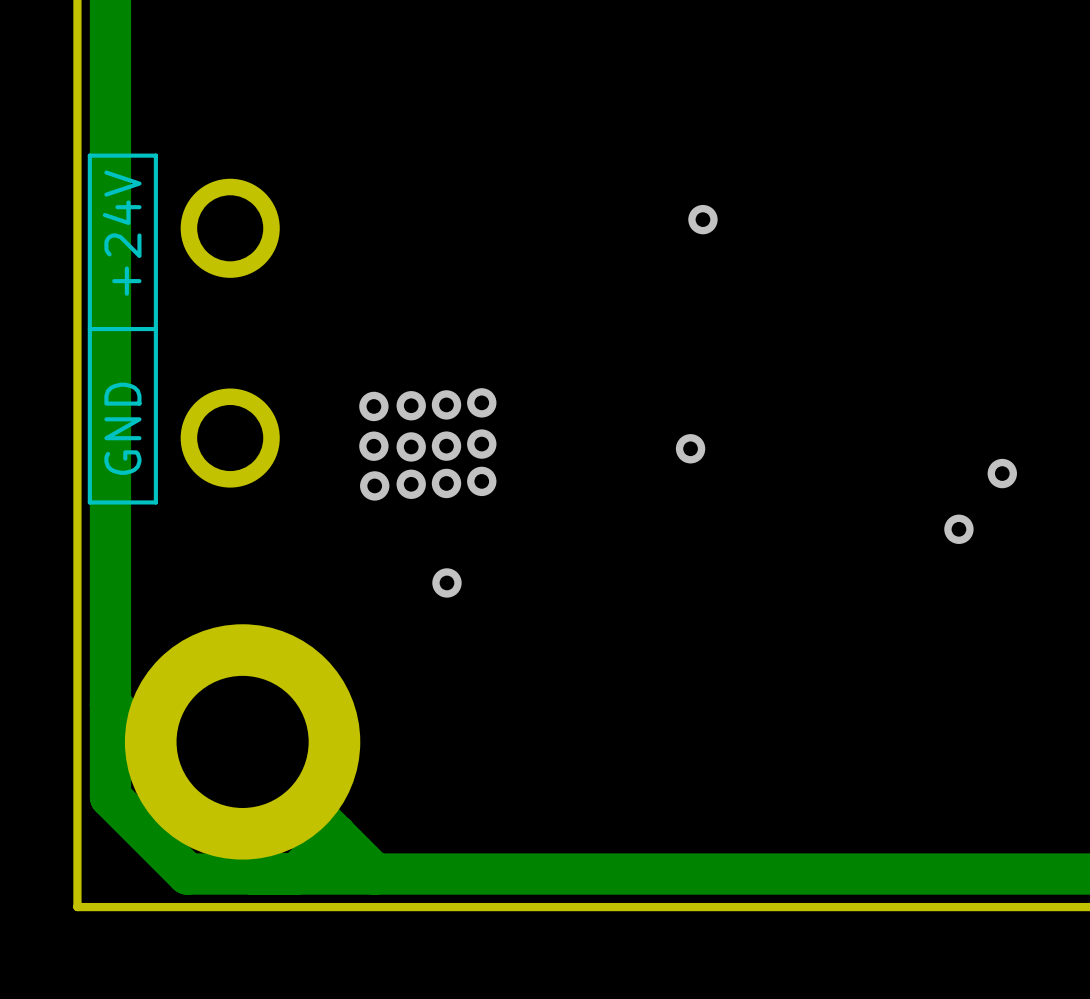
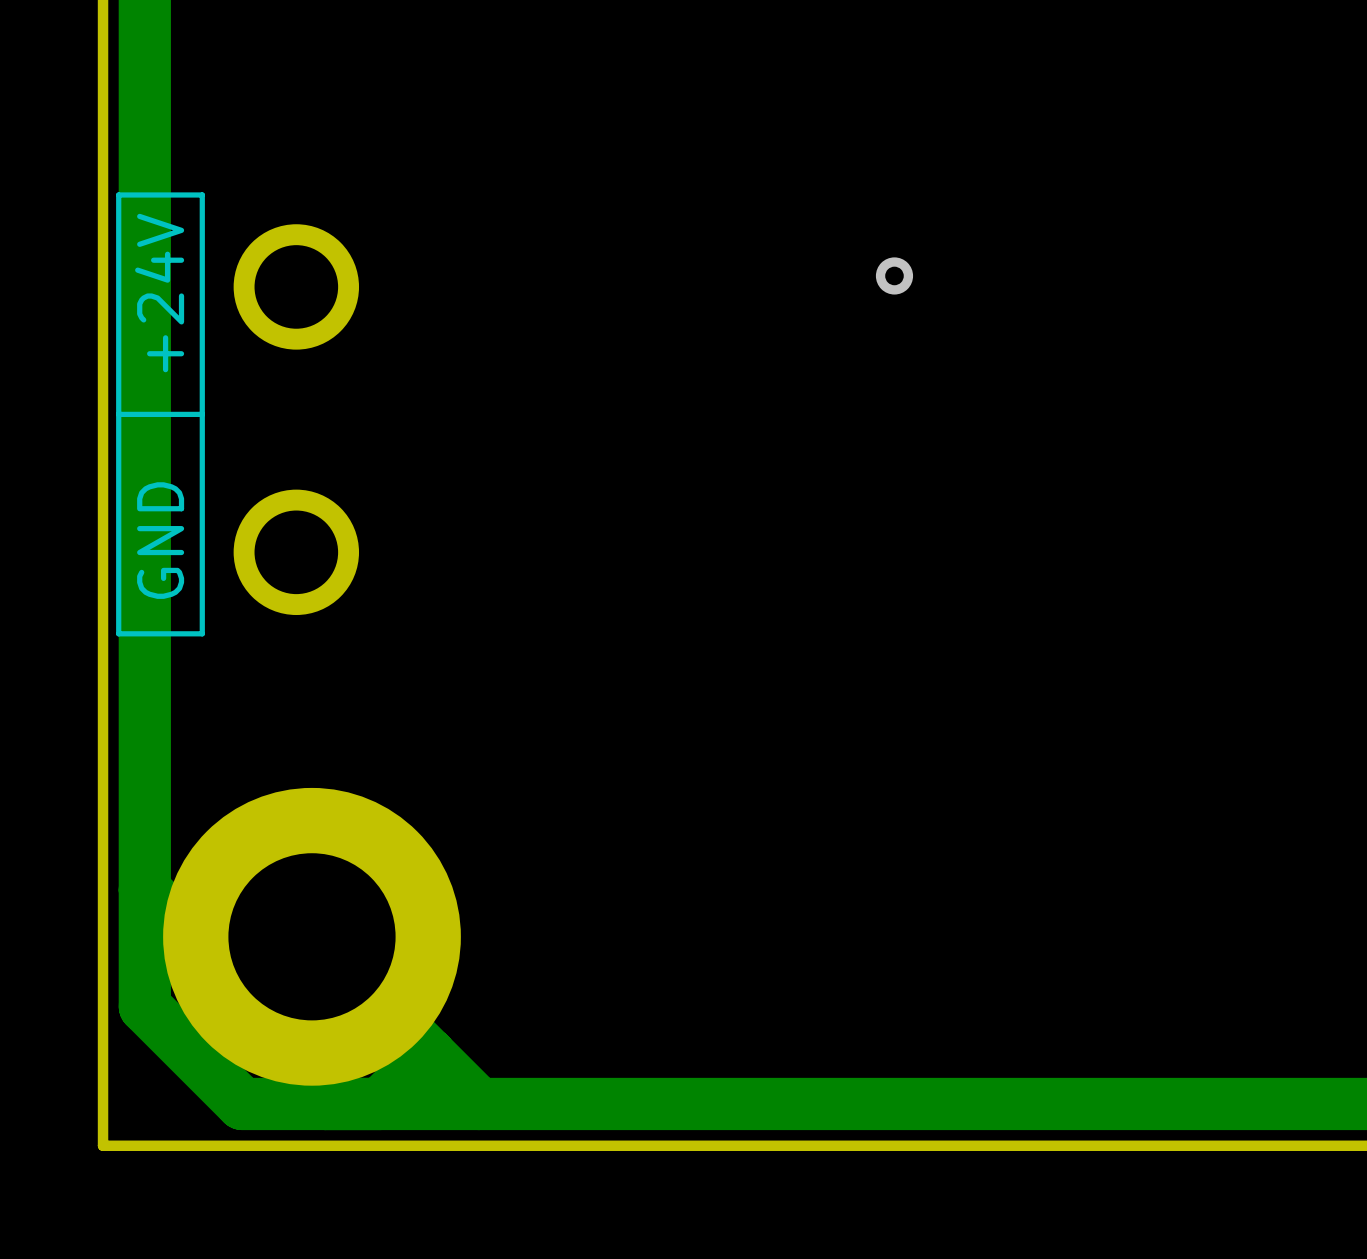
via: (481, 402) -> none
via: (446, 404) -> none
via: (411, 405) -> none
via: (373, 406) -> none
via: (481, 444) -> none
via: (373, 446) -> none
via: (411, 446) -> none
via: (446, 446) -> none
via: (690, 448) -> none
via: (1002, 473) -> none
via: (481, 481) -> none
via: (446, 483) -> none
via: (411, 484) -> none
via: (374, 485) -> none
via: (958, 529) -> none
via: (446, 582) -> none

